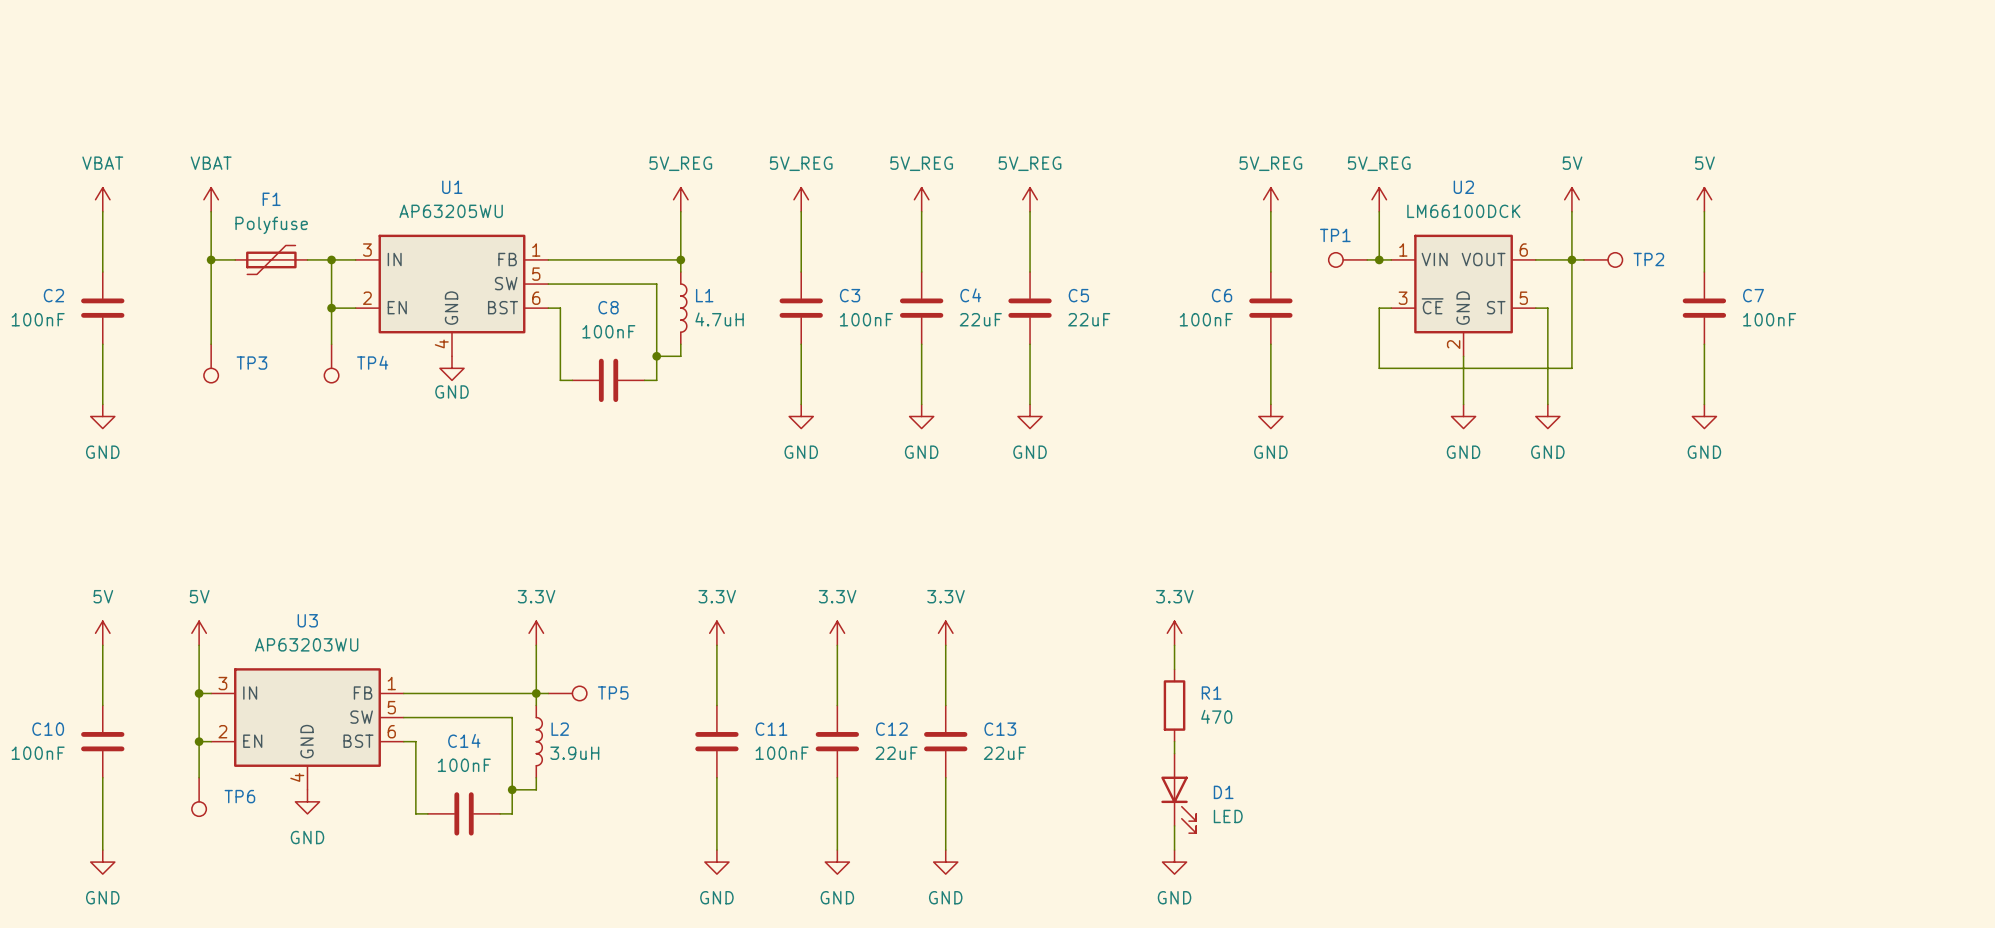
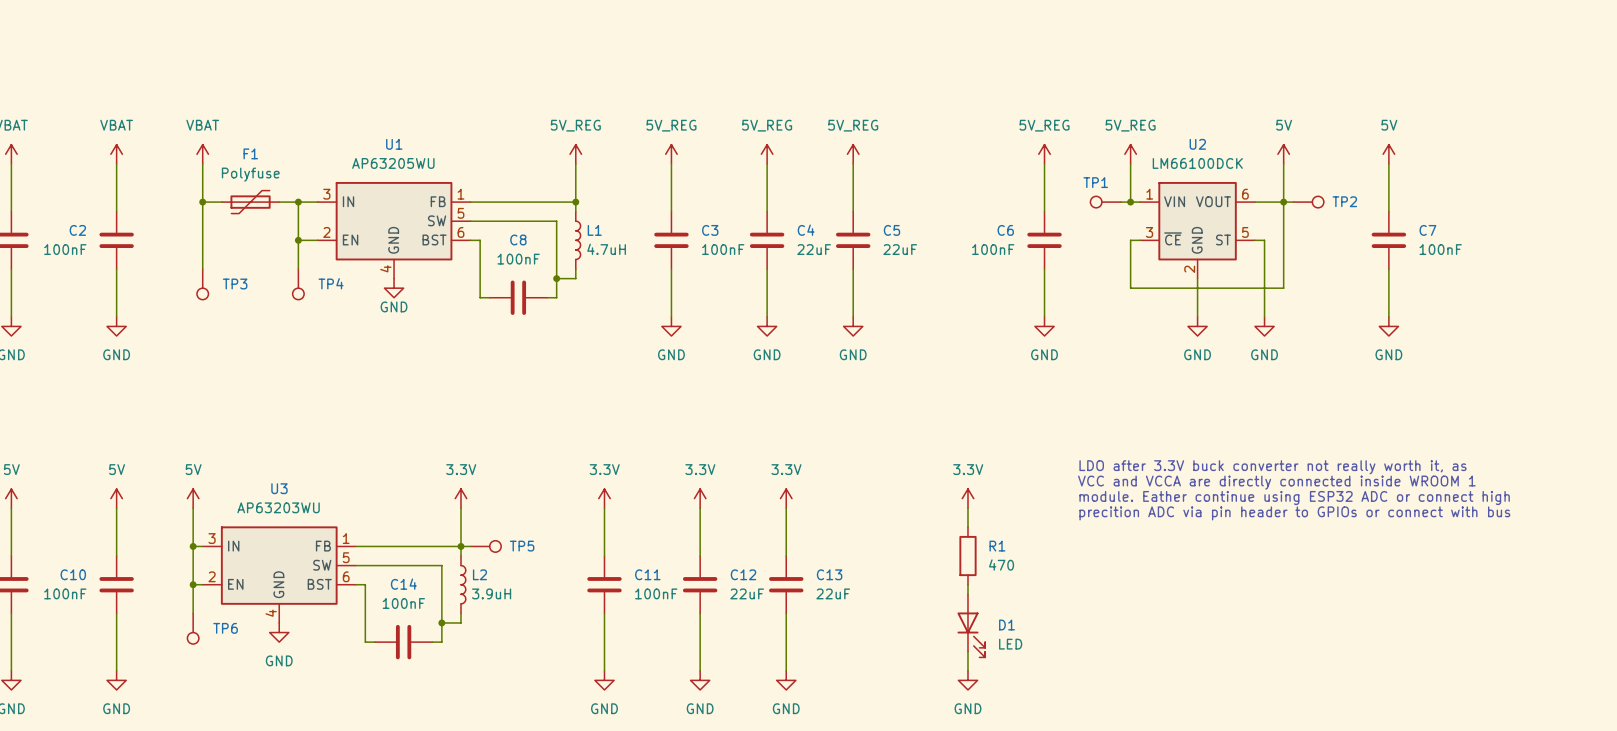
text: none -> LDO after 3.3V buck converter not really worth it, as (1272, 467)
text: none -> VCC and VCCA are directly connected inside WROOM 1 (1276, 482)
text: none -> module. Eather continue using ESP32 ADC or connect high (1294, 498)
text: none -> precition ADC via pin header to GPIOs or connect with bus (1294, 513)

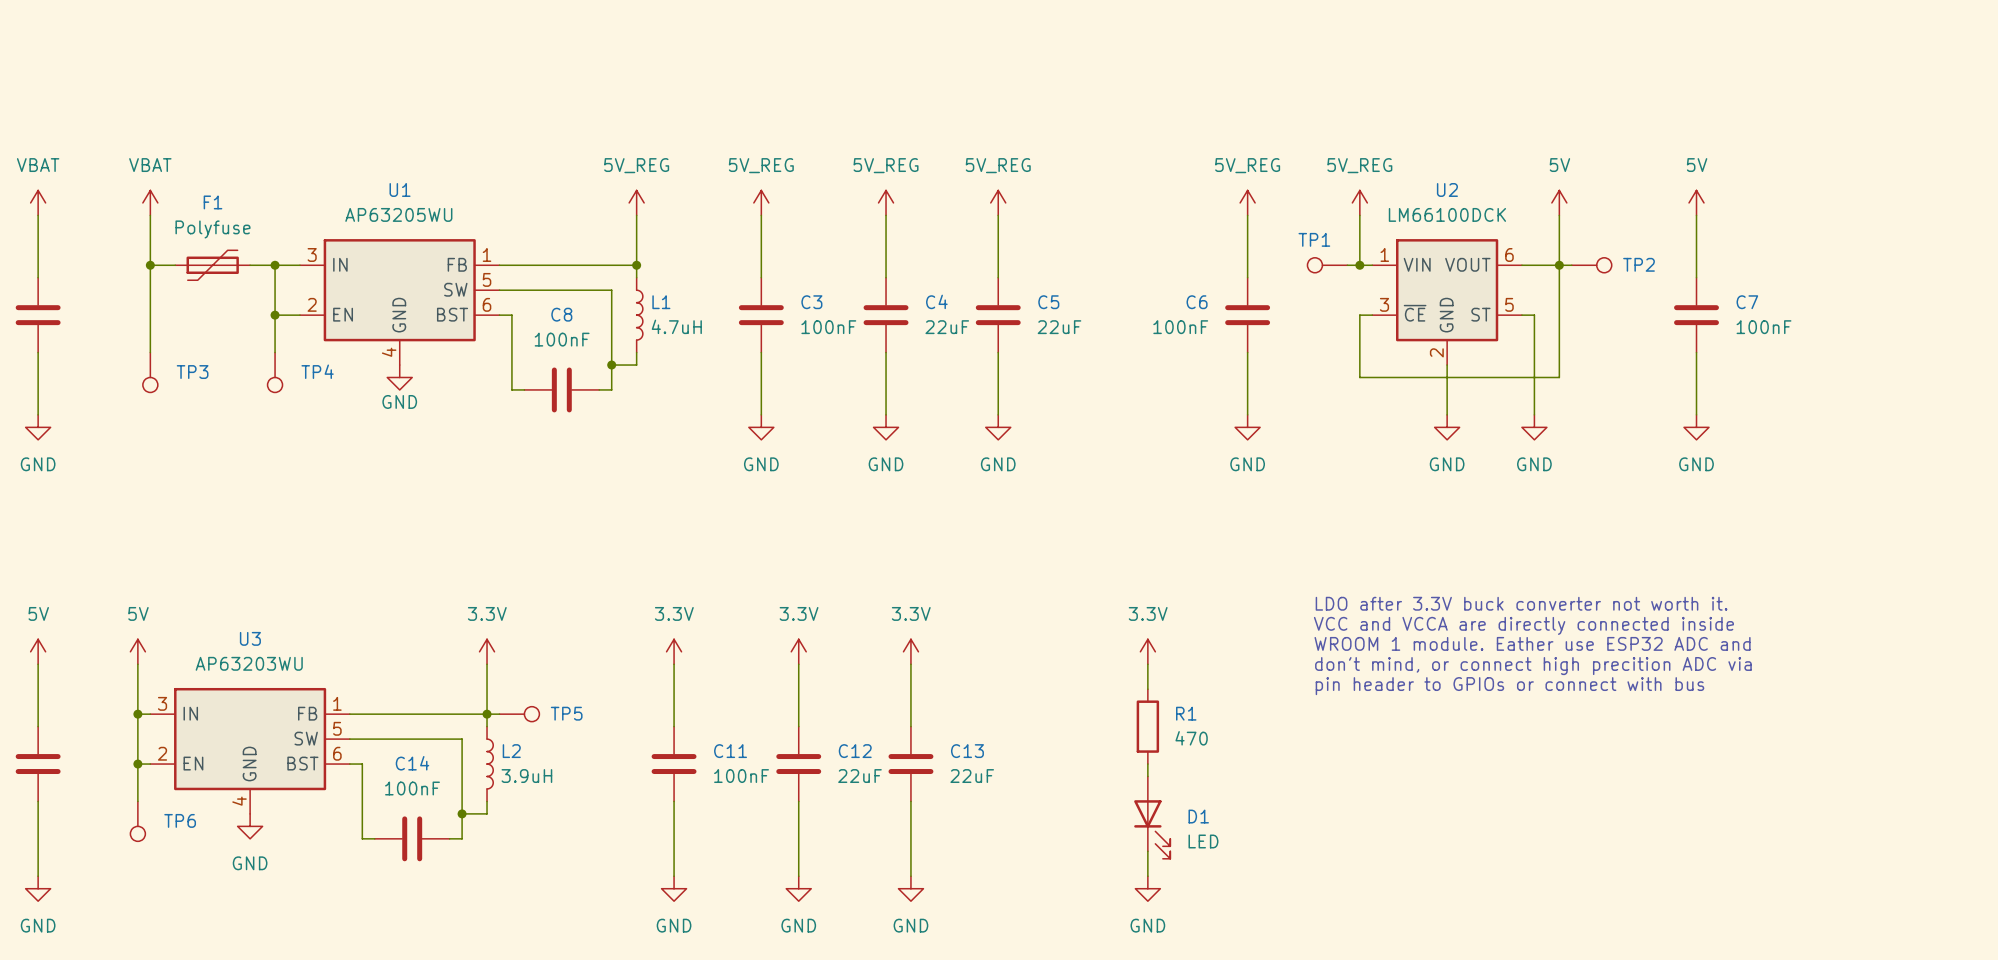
text: LDO after 3.3V buck converter not really worth it, as (1272, 467) -> LDO after 3.3V buck converter not worth it. (1521, 603)
text: VCC and VCCA are directly connected inside WROOM 1 (1276, 482) -> VCC and VCCA are directly connected inside (1523, 625)
text: module. Eather continue using ESP32 ADC or connect high (1294, 498) -> WROOM 1 module. Eather use ESP32 ADC and (1532, 643)
text: none -> don't mind, or connect high precition ADC via (1533, 666)
text: precition ADC via pin header to GPIOs or connect with bus (1294, 513) -> pin header to GPIOs or connect with bus (1509, 686)

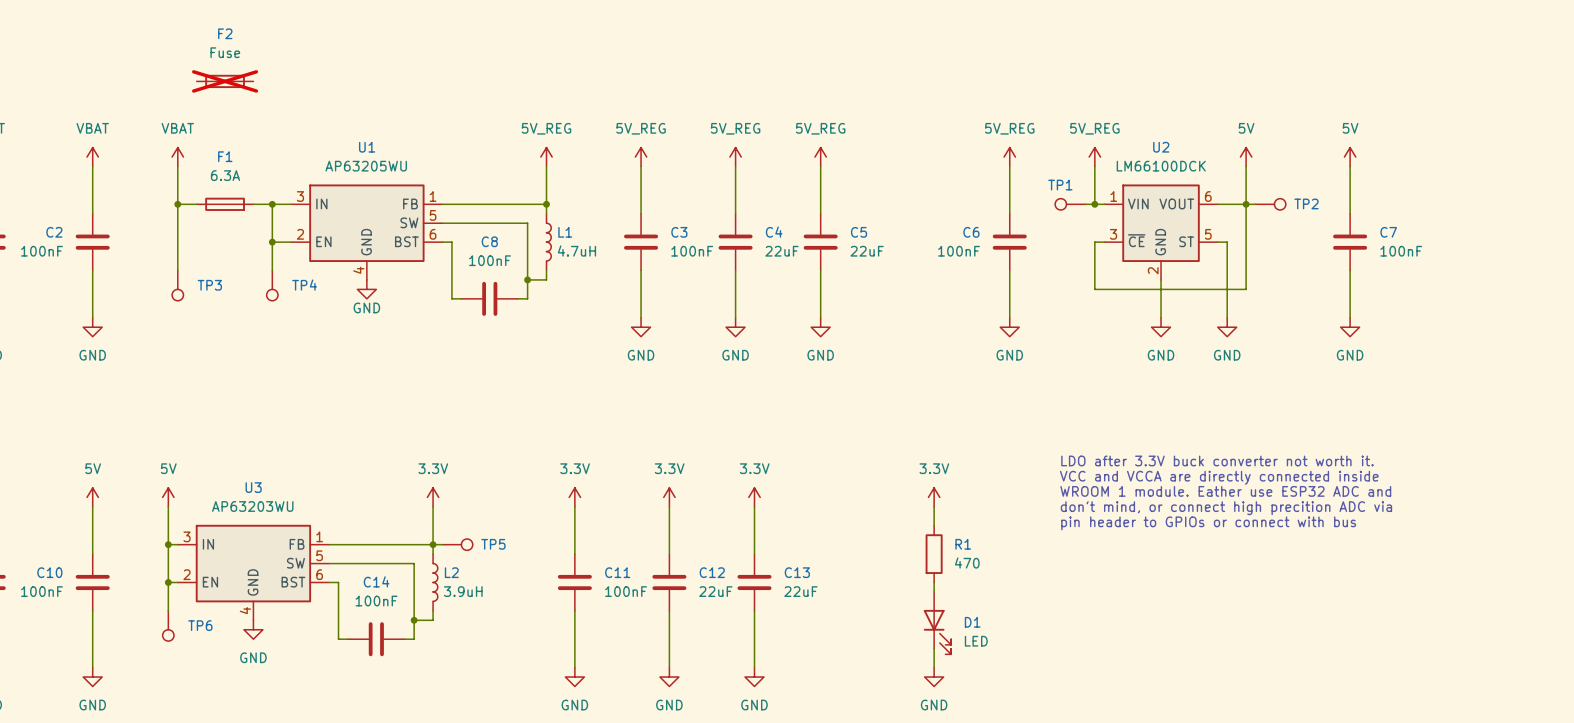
F2: none -> Fuse (225, 81)
F1 value: Polyfuse (212, 229) -> 6.3A (225, 175)
F1 symbol: [175, 250, 251, 281] -> [196, 197, 254, 211]

